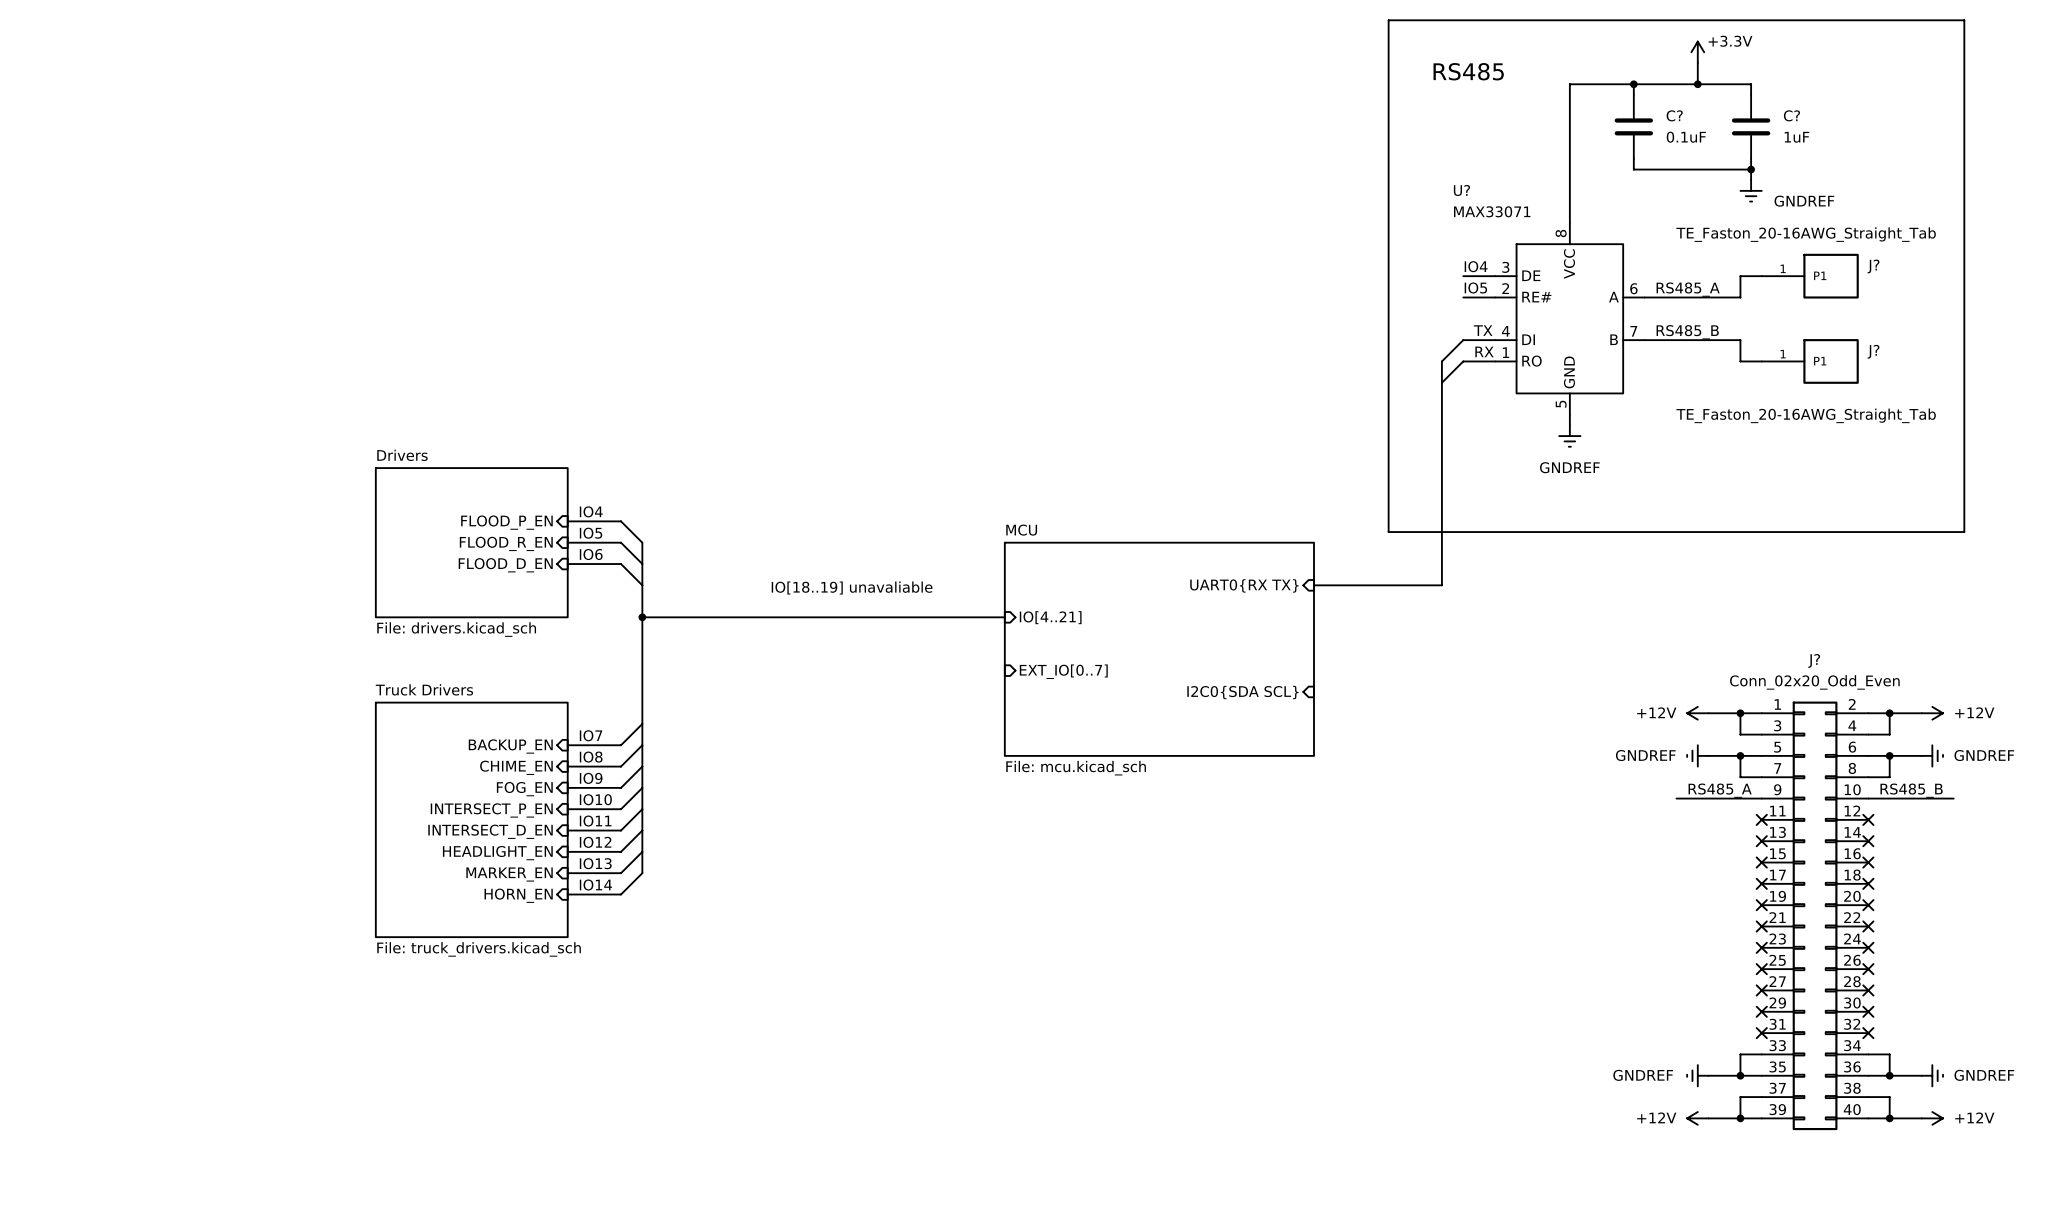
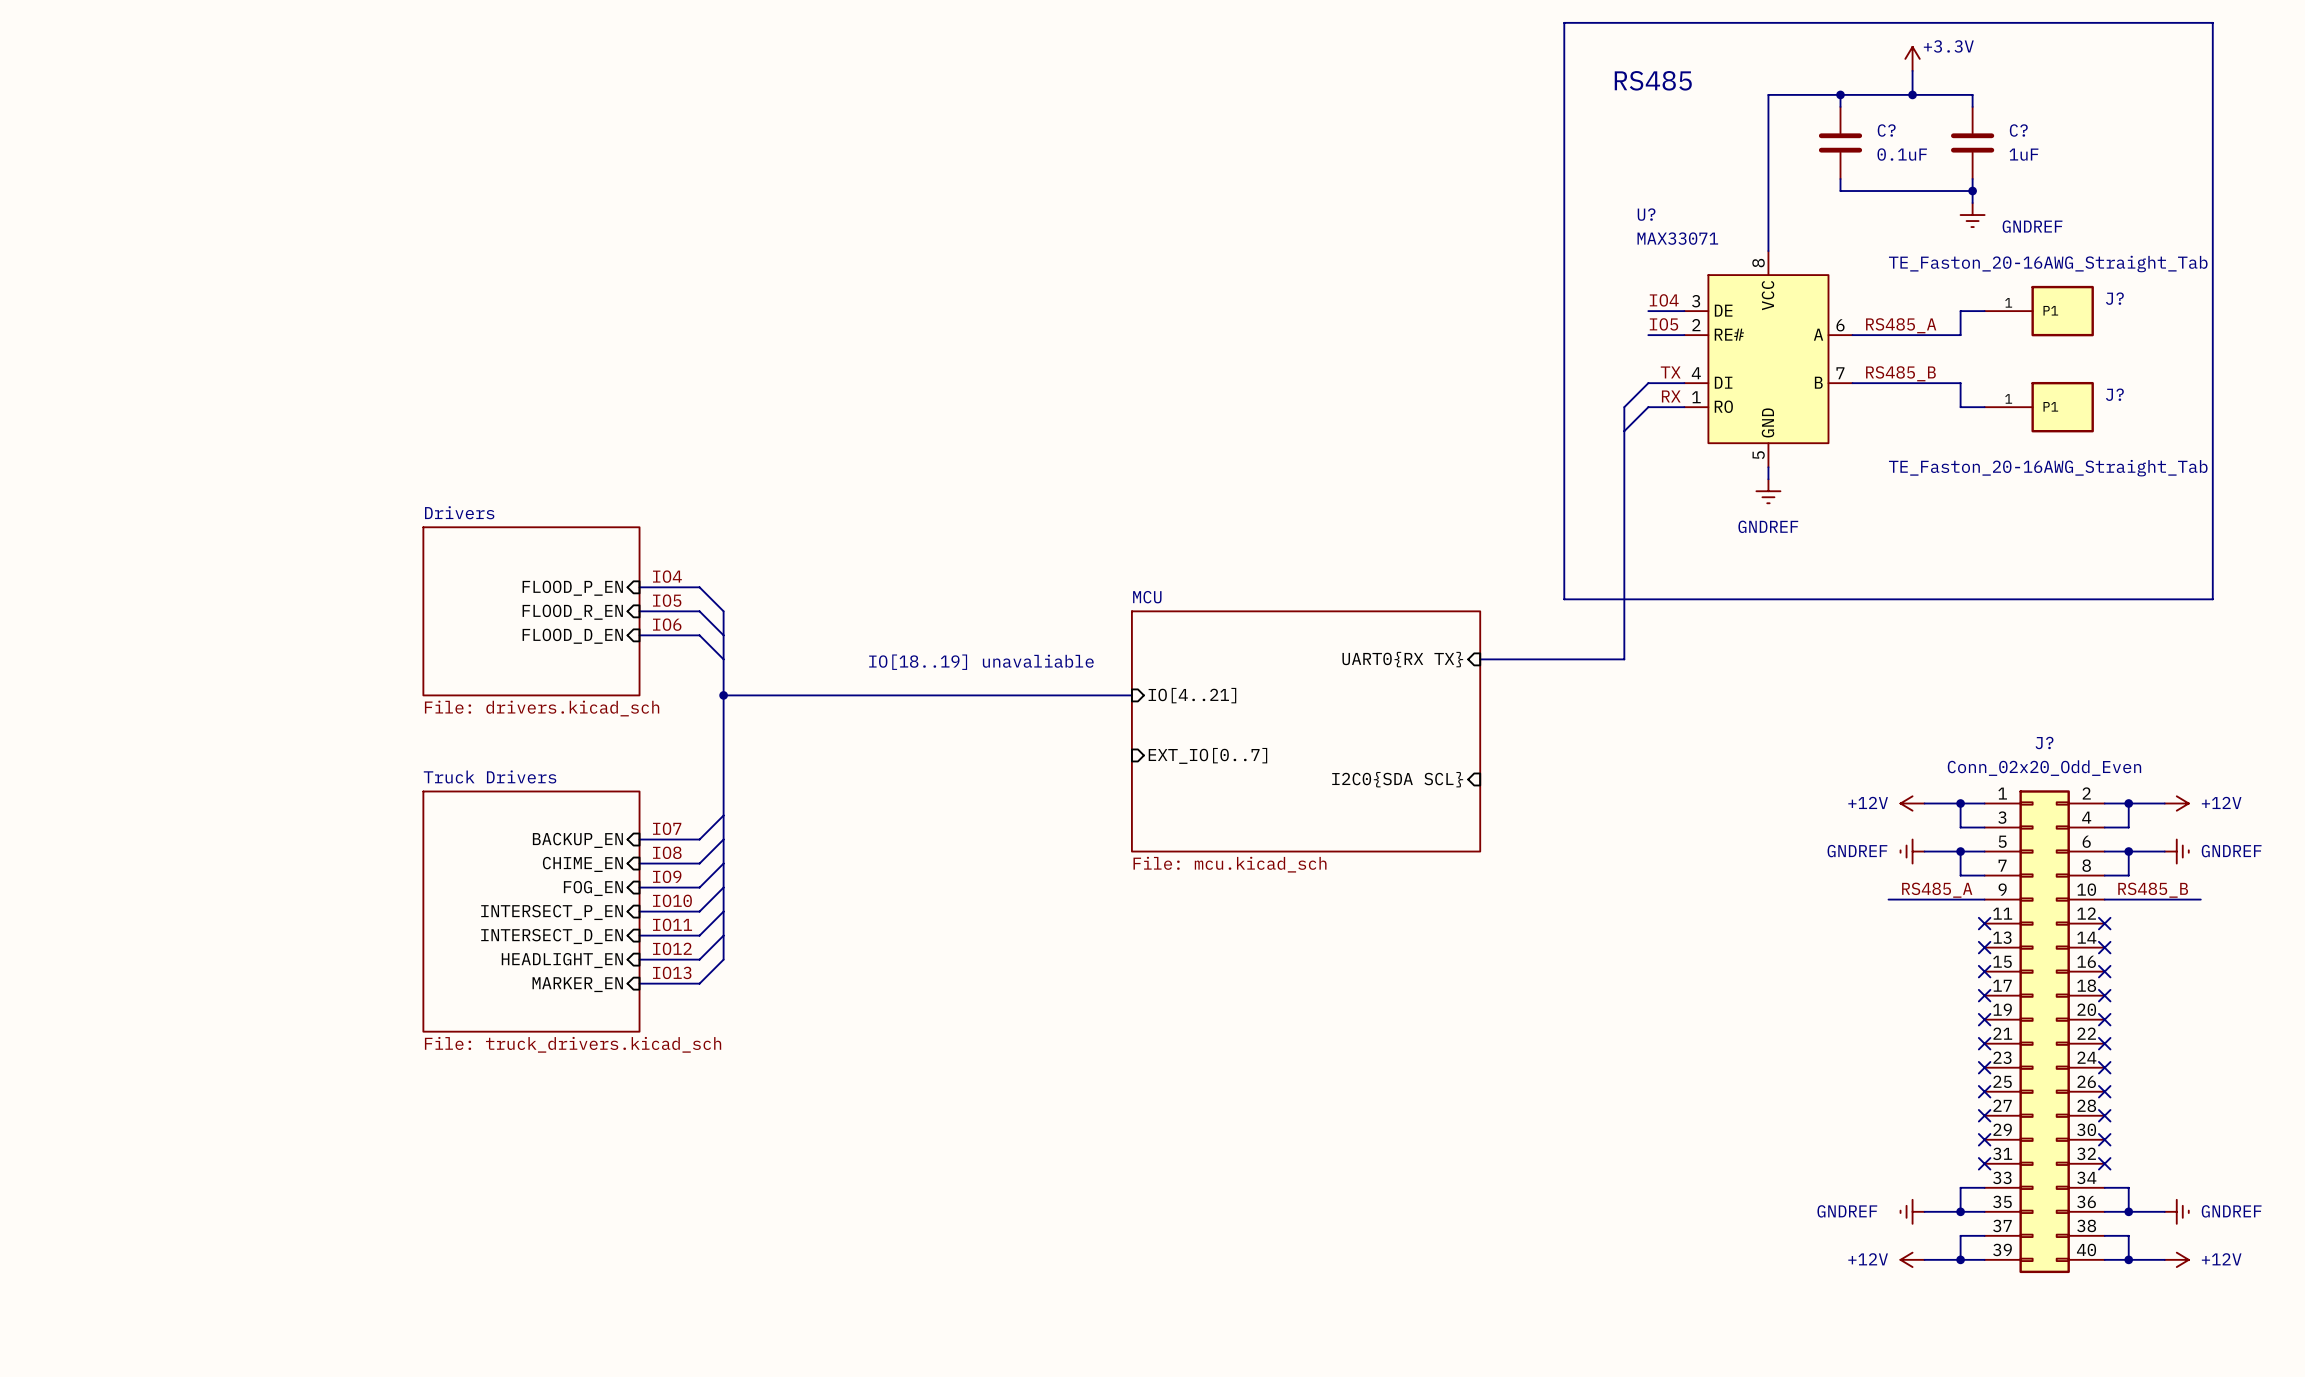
sheet Truck Drivers: none -> File: truck_drivers.kicad_sch (531, 911)
sheet Truck Drivers: File: truck_drivers.kicad_sch (471, 819) -> none
bus: (642, 851) (642, 873) -> none
wire: (642, 873) (621, 894) (567, 894) -> none
label: IO14 (595, 885) -> none
sheet pin: HORN_EN (518, 895) -> none

